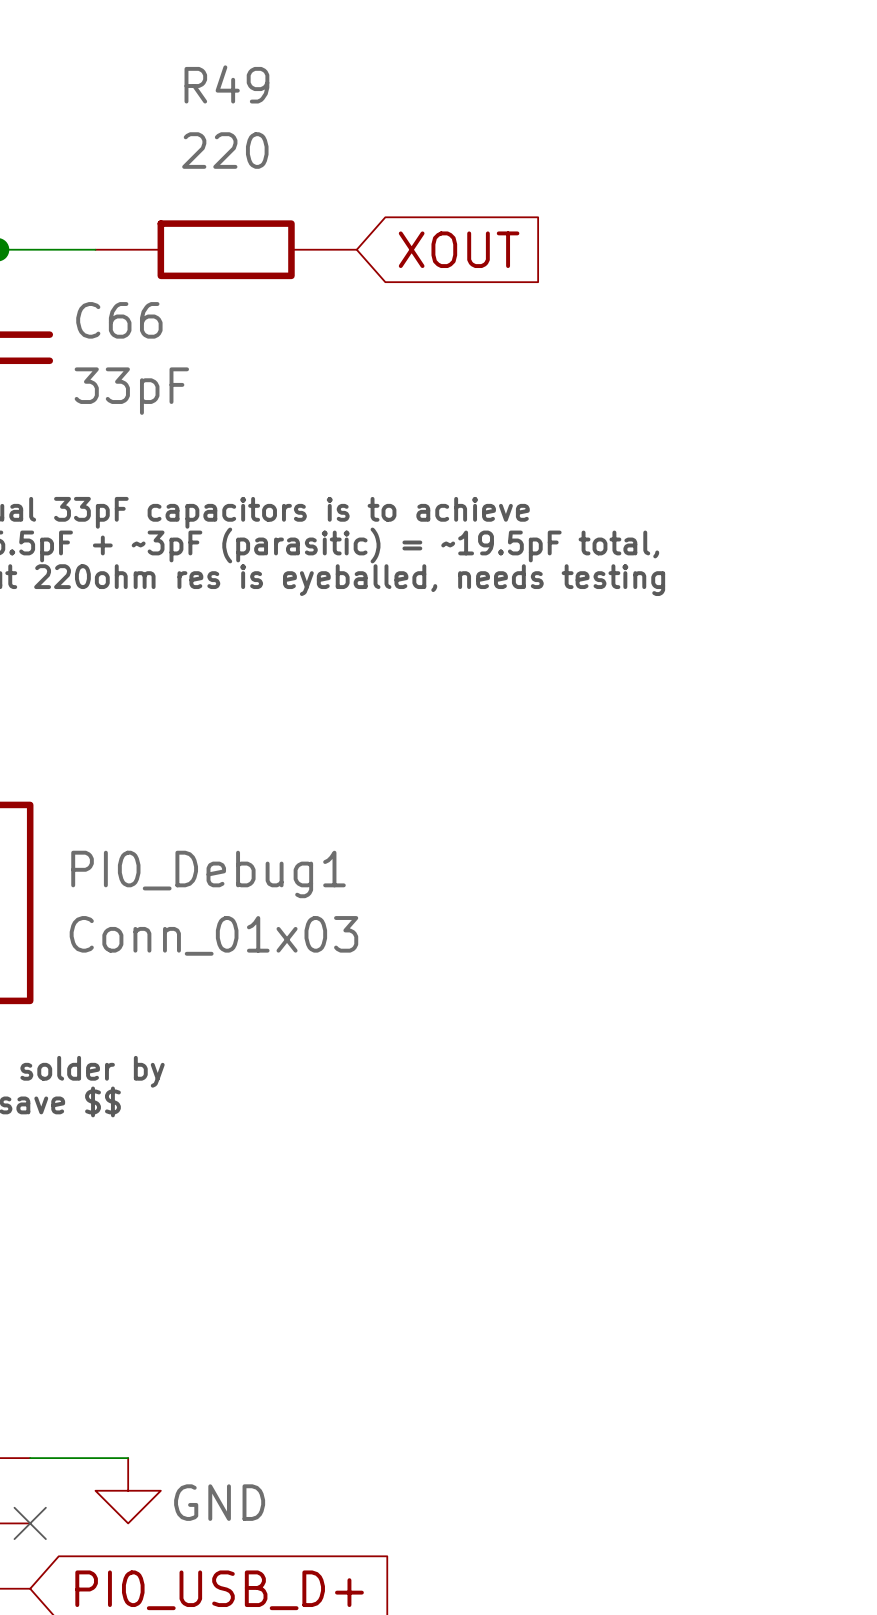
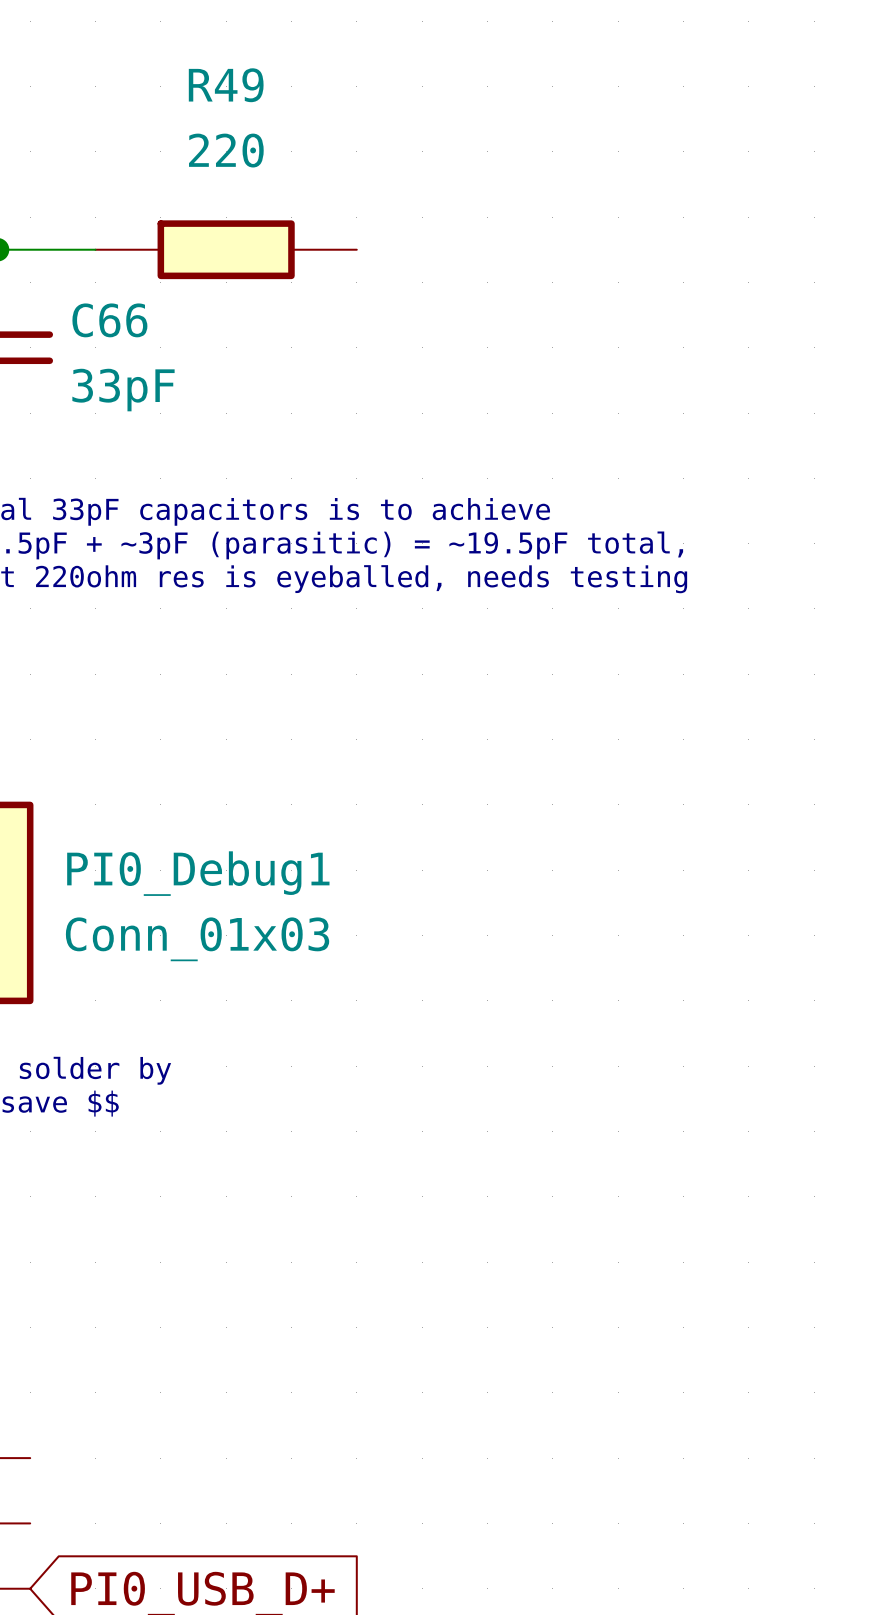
global label: XOUT (459, 249) -> none
wire: (30, 1458) (128, 1458) -> none
power symbol: GND (128, 1490) -> none
no-connect mark: (30, 1523) -> none

